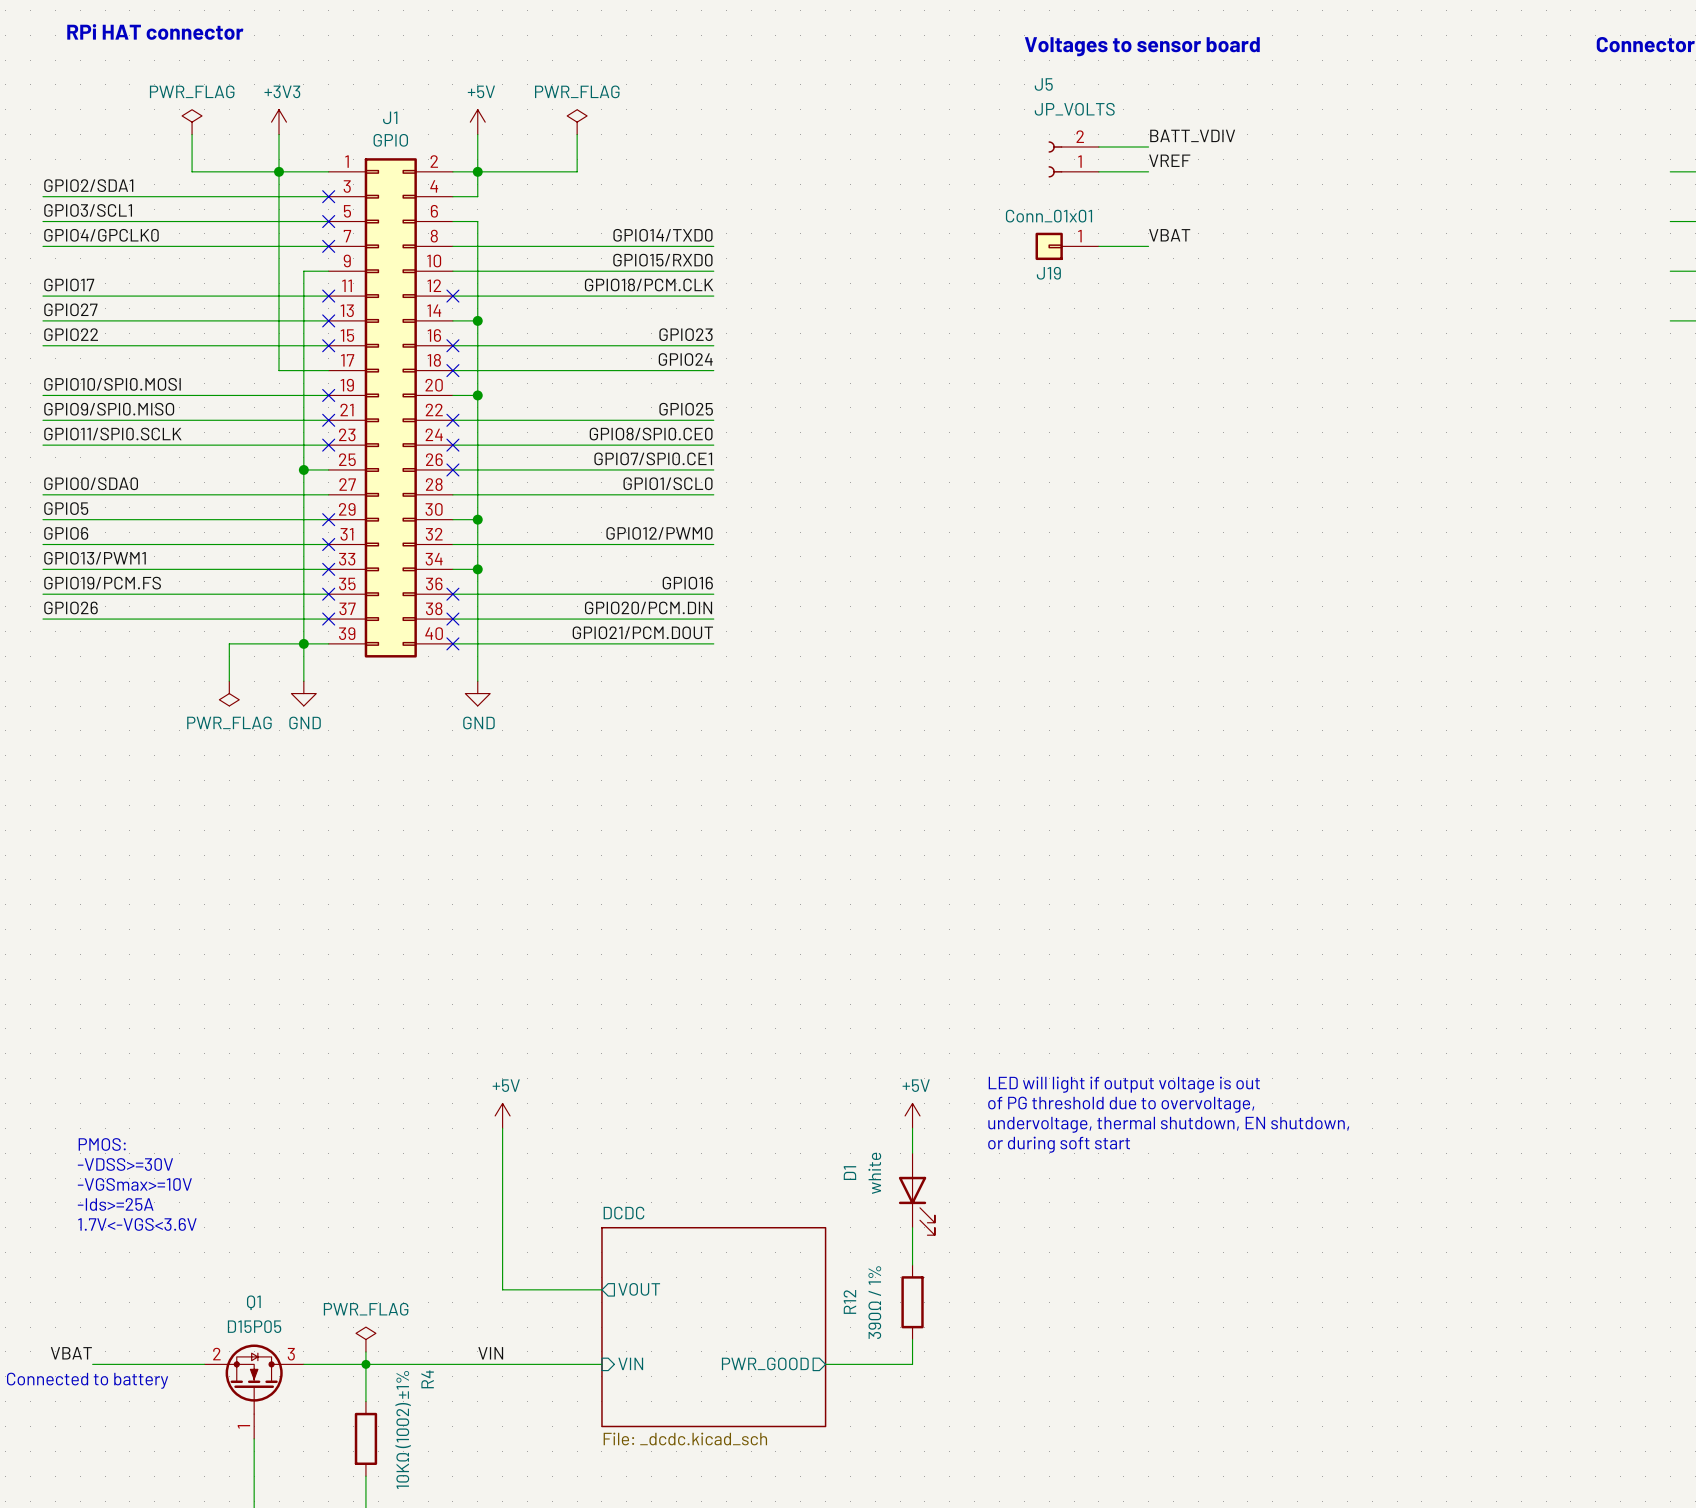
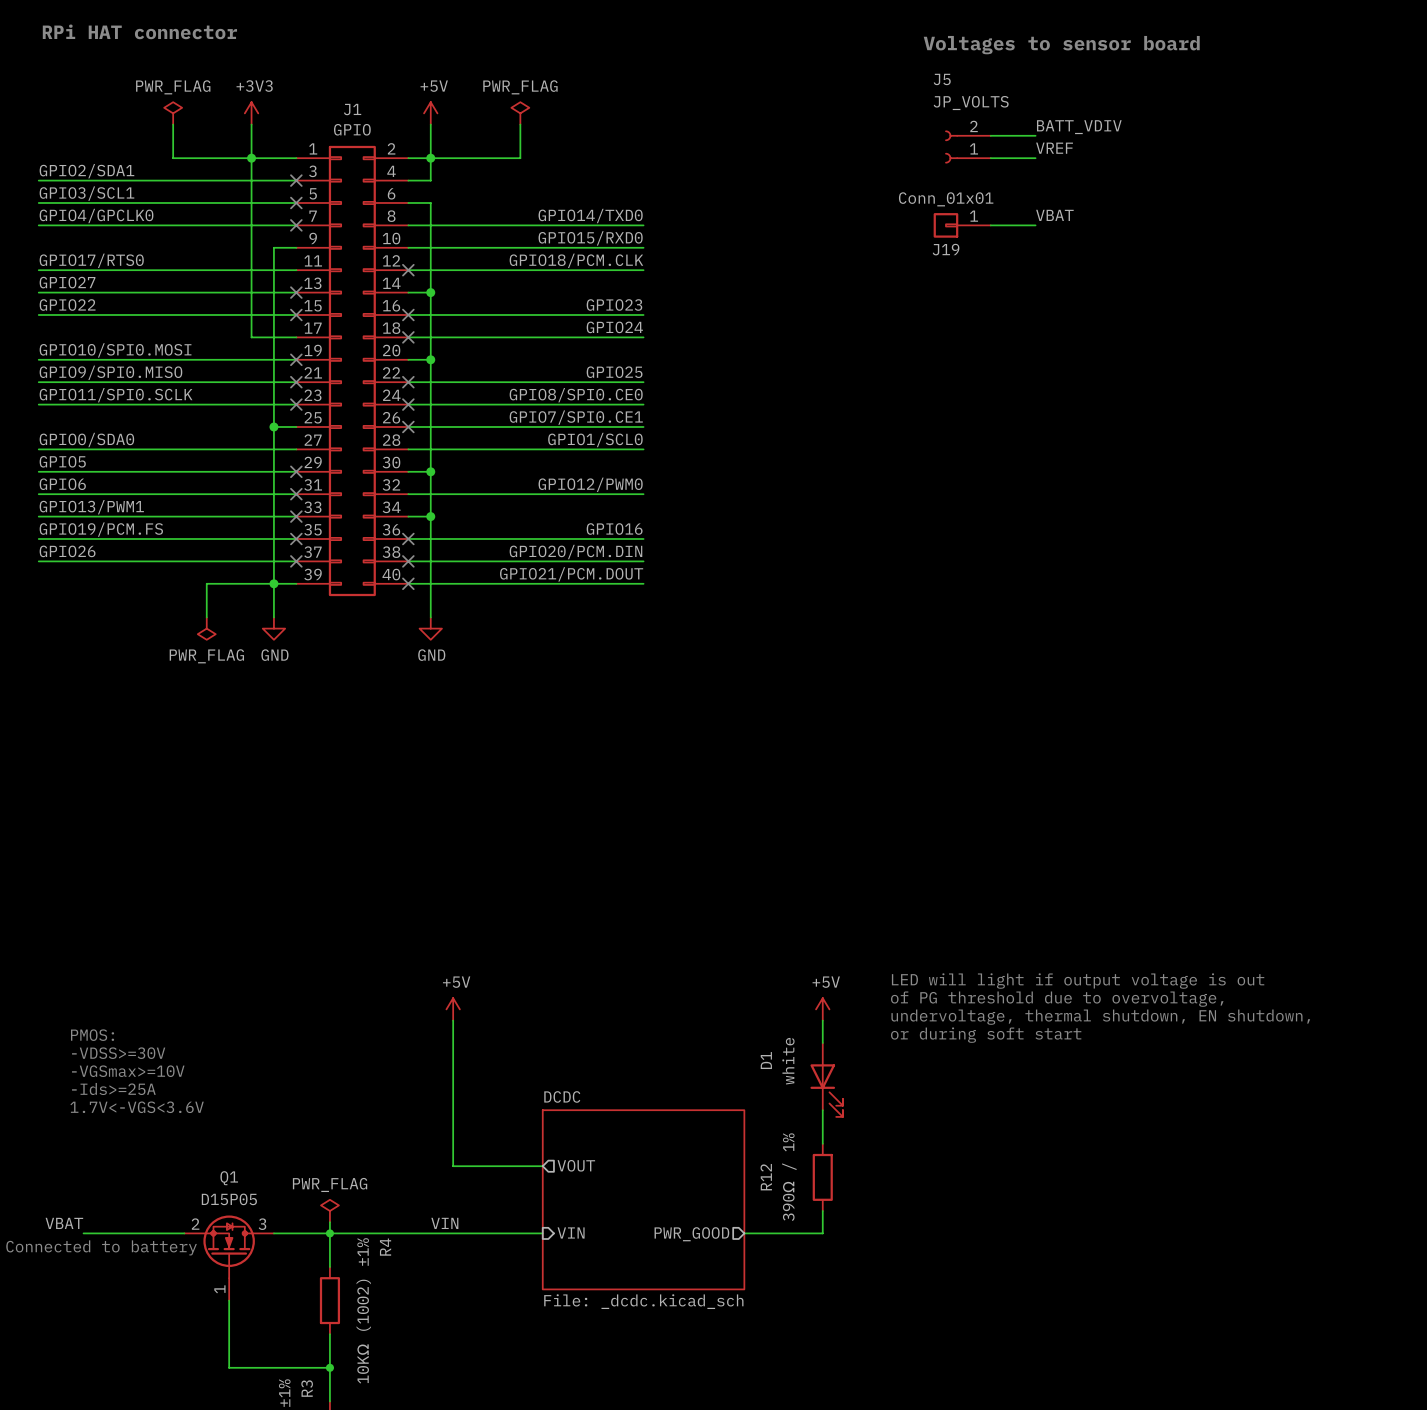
label: GPIO17 (69, 284) -> GPIO17/RTS0 (91, 260)
no-connect mark: (328, 296) -> none

